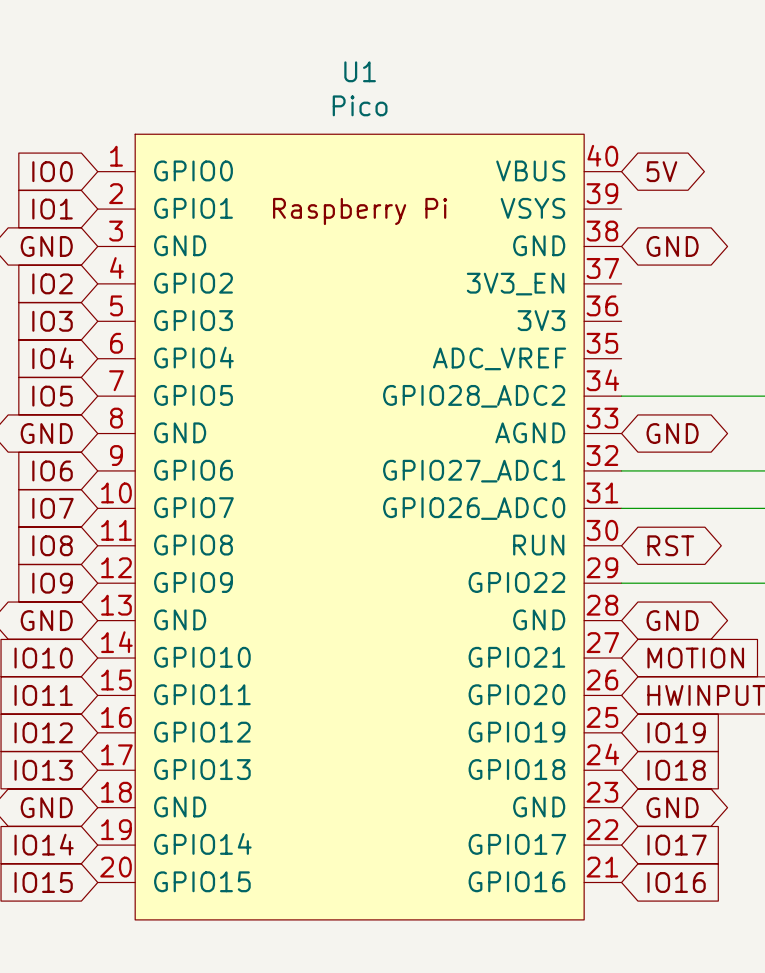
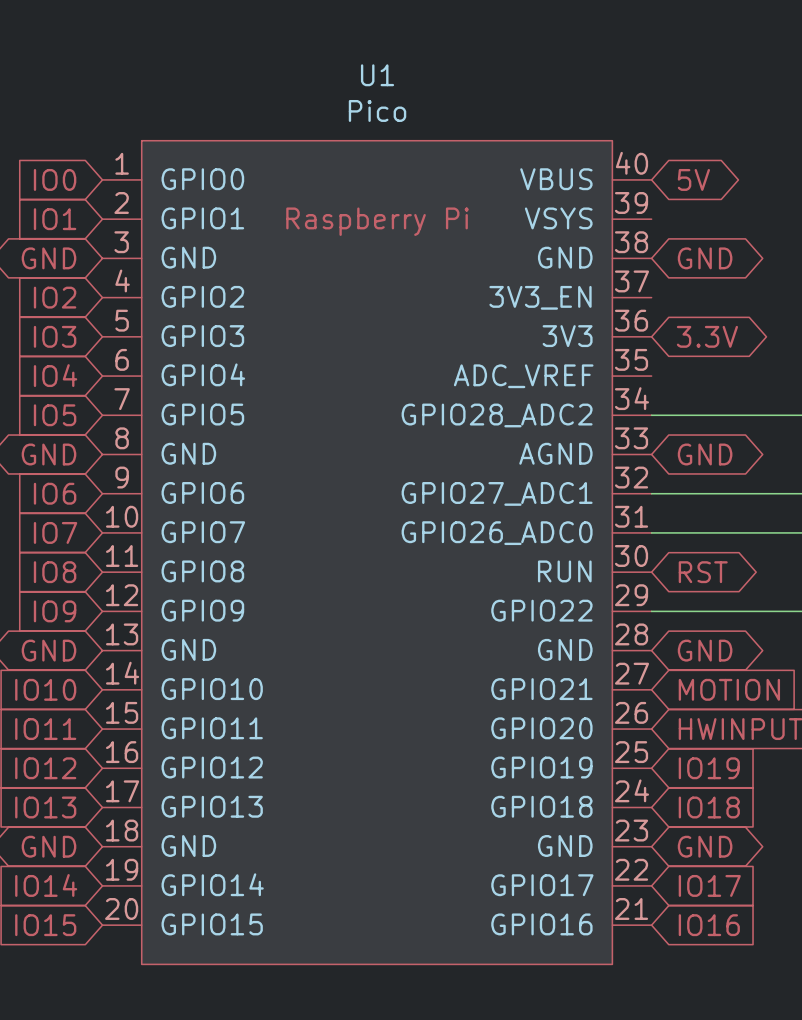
global label: none -> 3.3V (707, 336)

